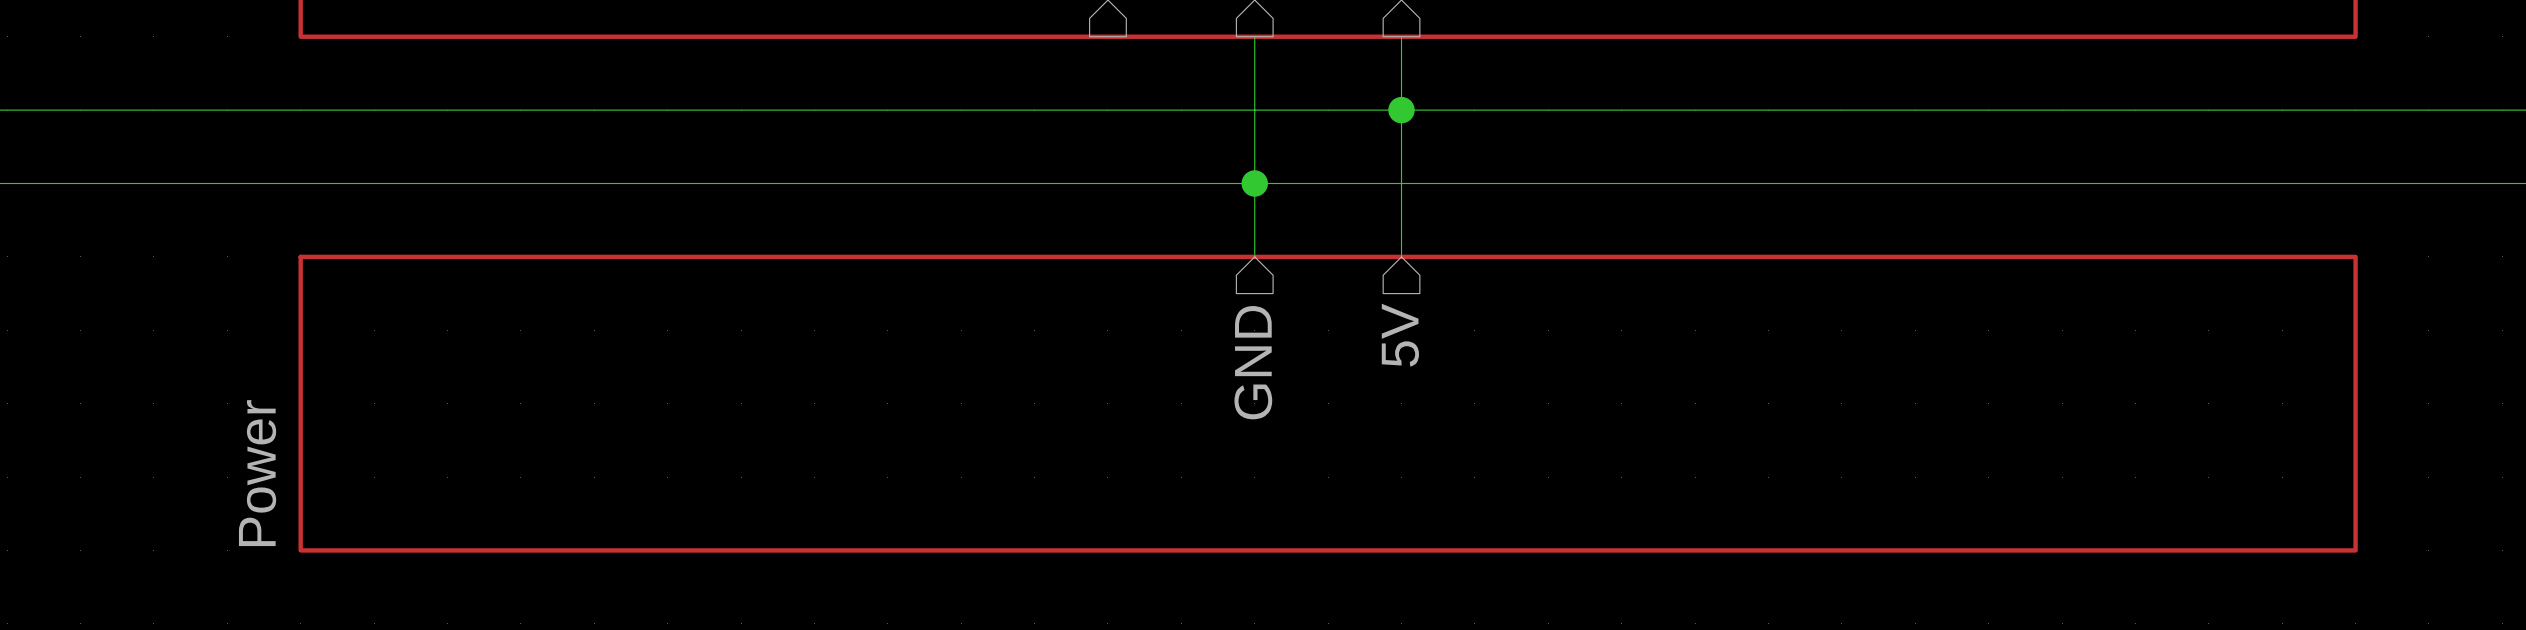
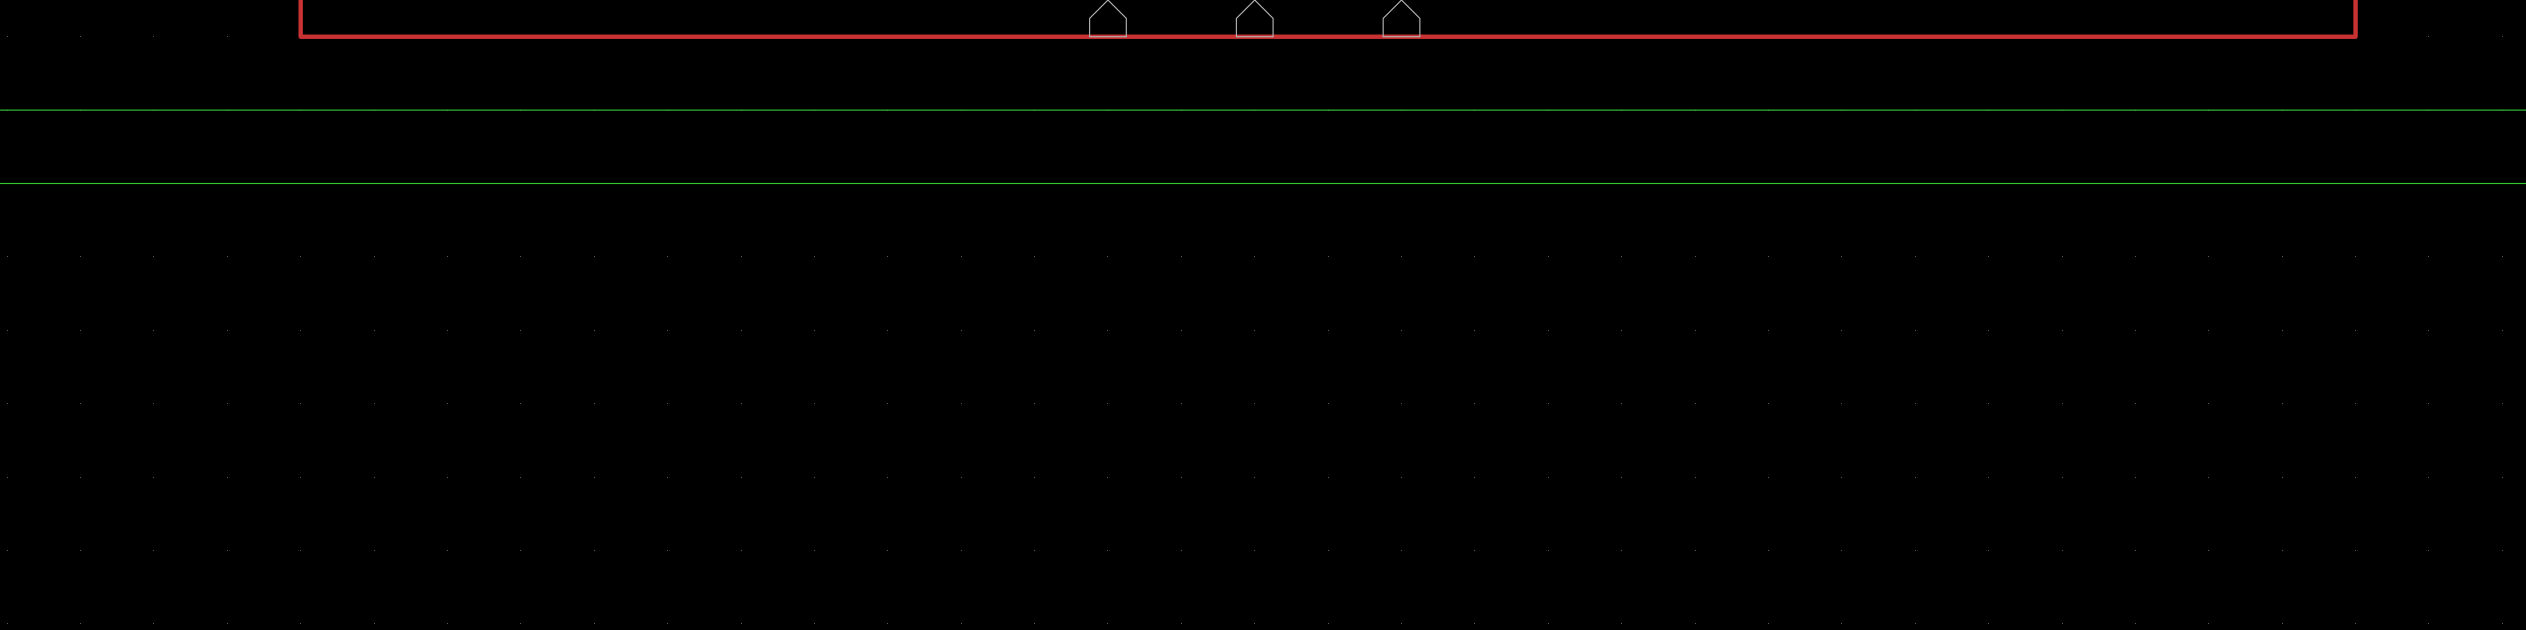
wire: (1254, 36) (1254, 256) -> none
wire: (1401, 36) (1401, 256) -> none
junction: (1401, 110) -> none
junction: (1254, 183) -> none
sheet pin: 5V (1400, 335) -> none
sheet pin: GND (1253, 362) -> none
sheet Power: (1328, 403) -> none

